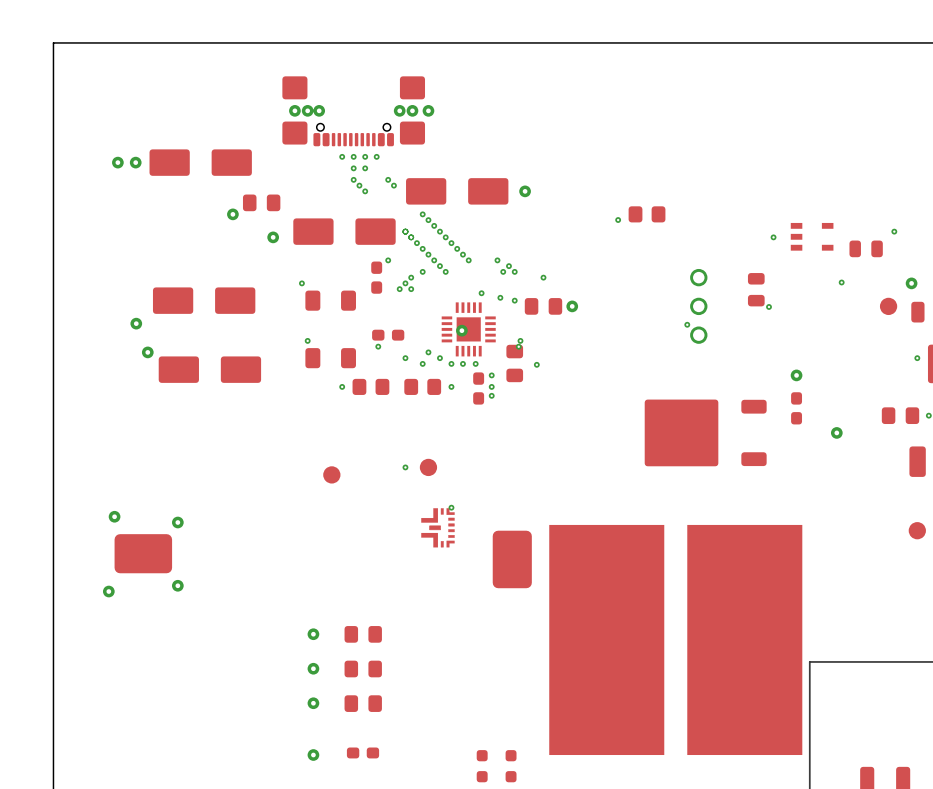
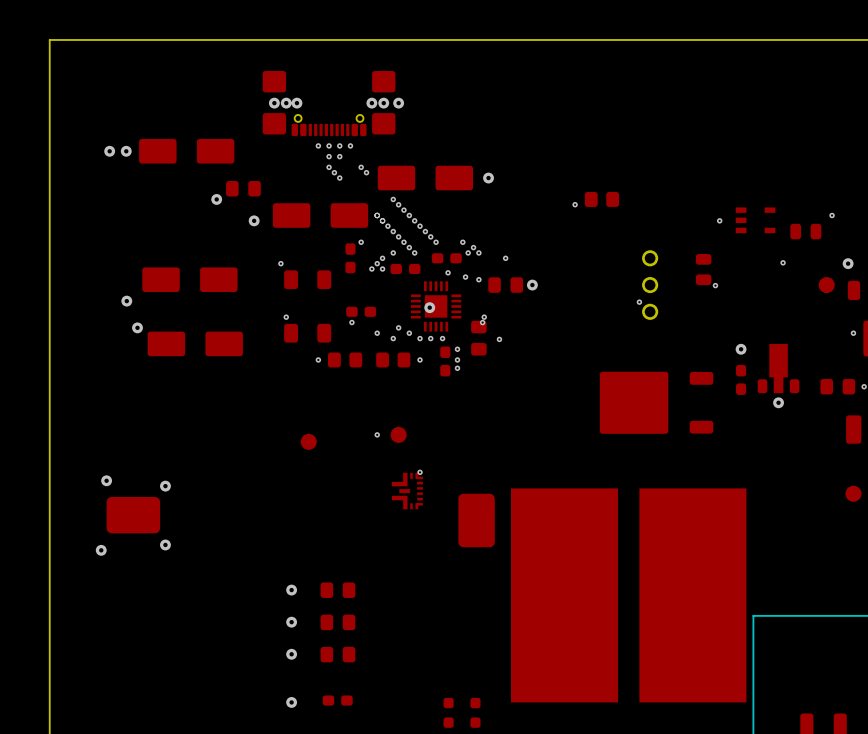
part: none -> (446, 258)
part: none -> (405, 269)
part: none -> (778, 368)

